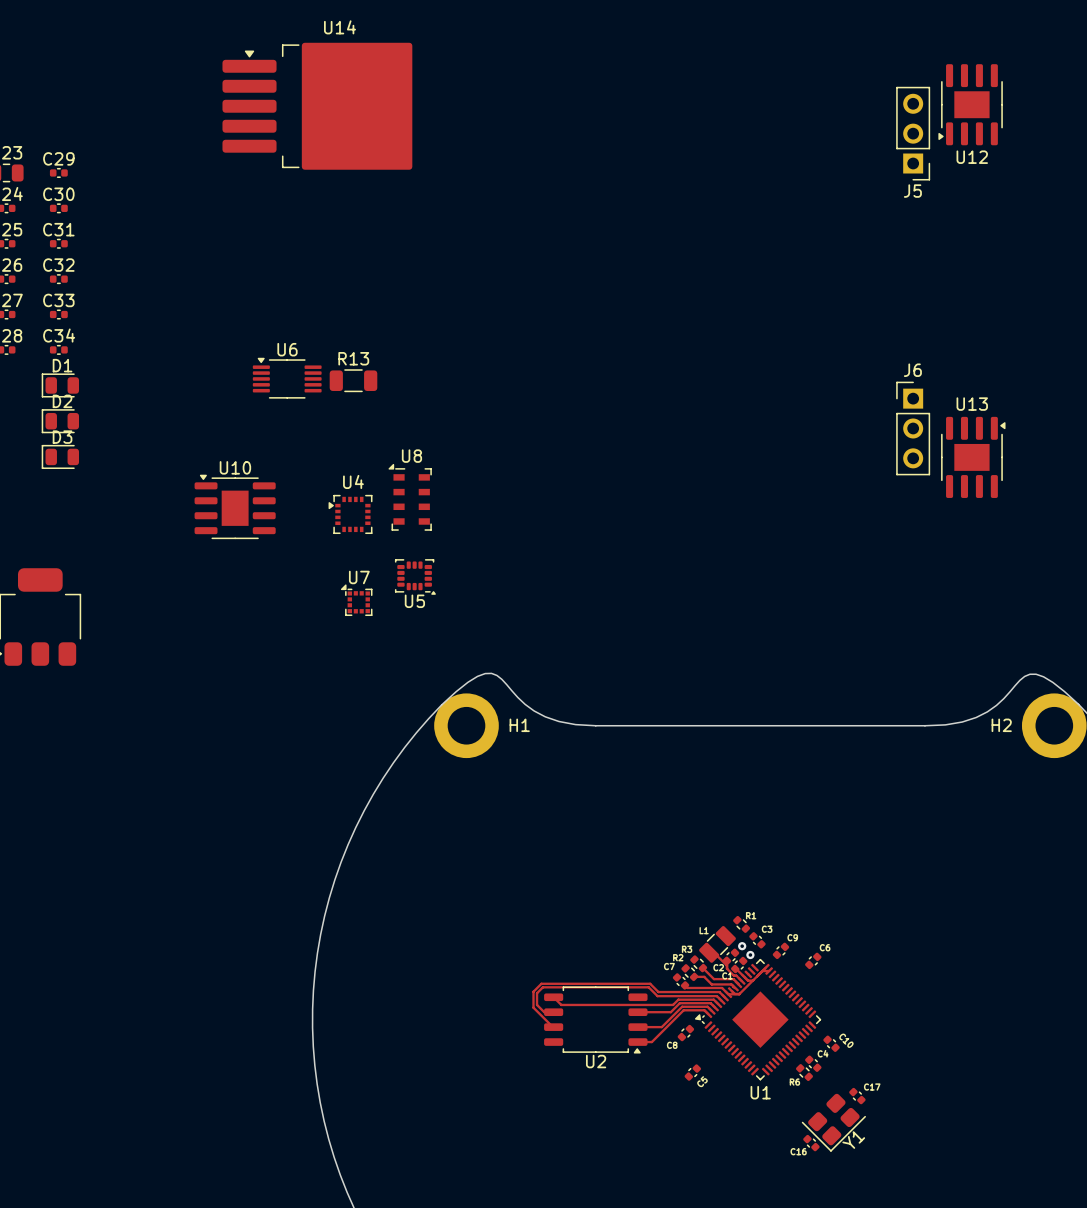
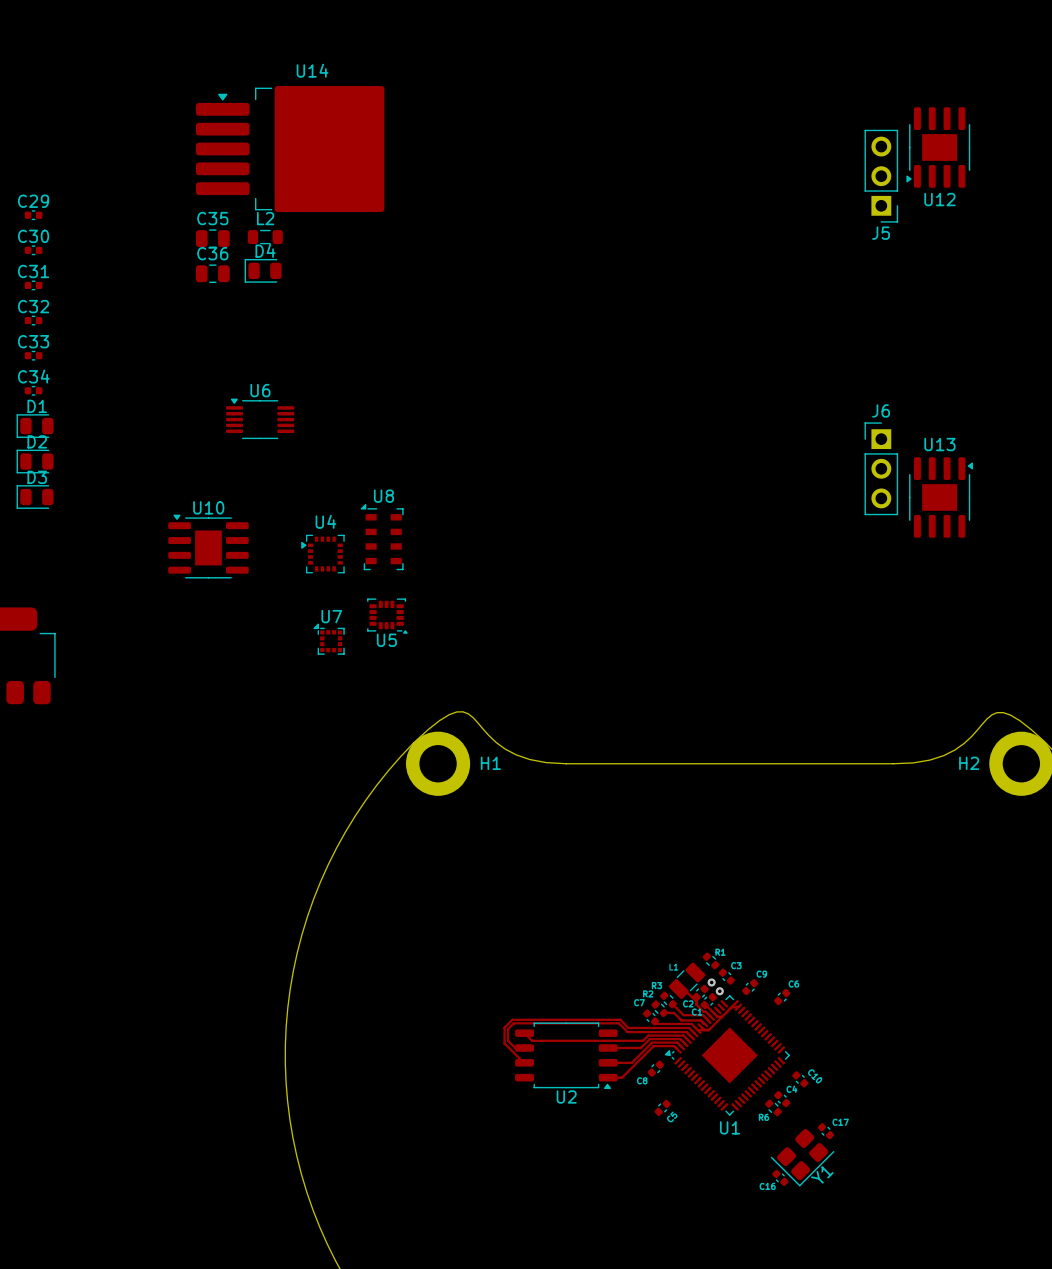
L2: none -> (265, 237)
C35: none -> (212, 238)
D4: none -> (263, 270)
C36: none -> (212, 273)
R13: (353, 380) -> none

